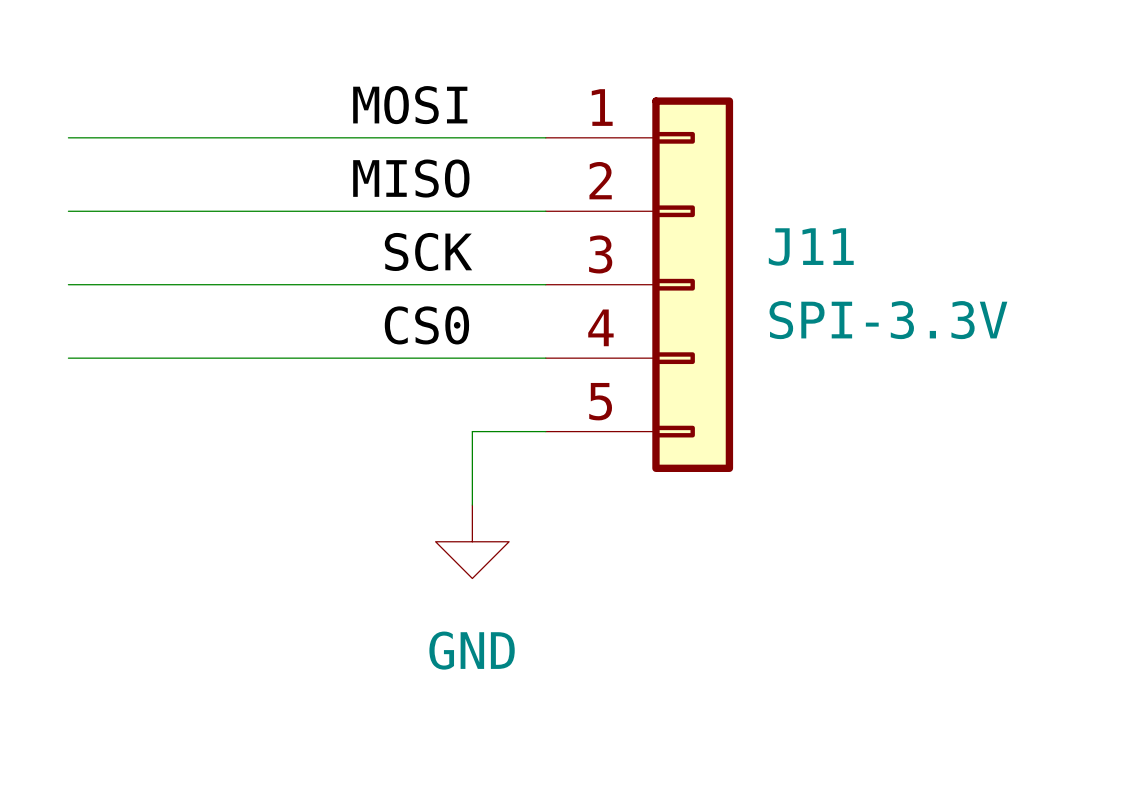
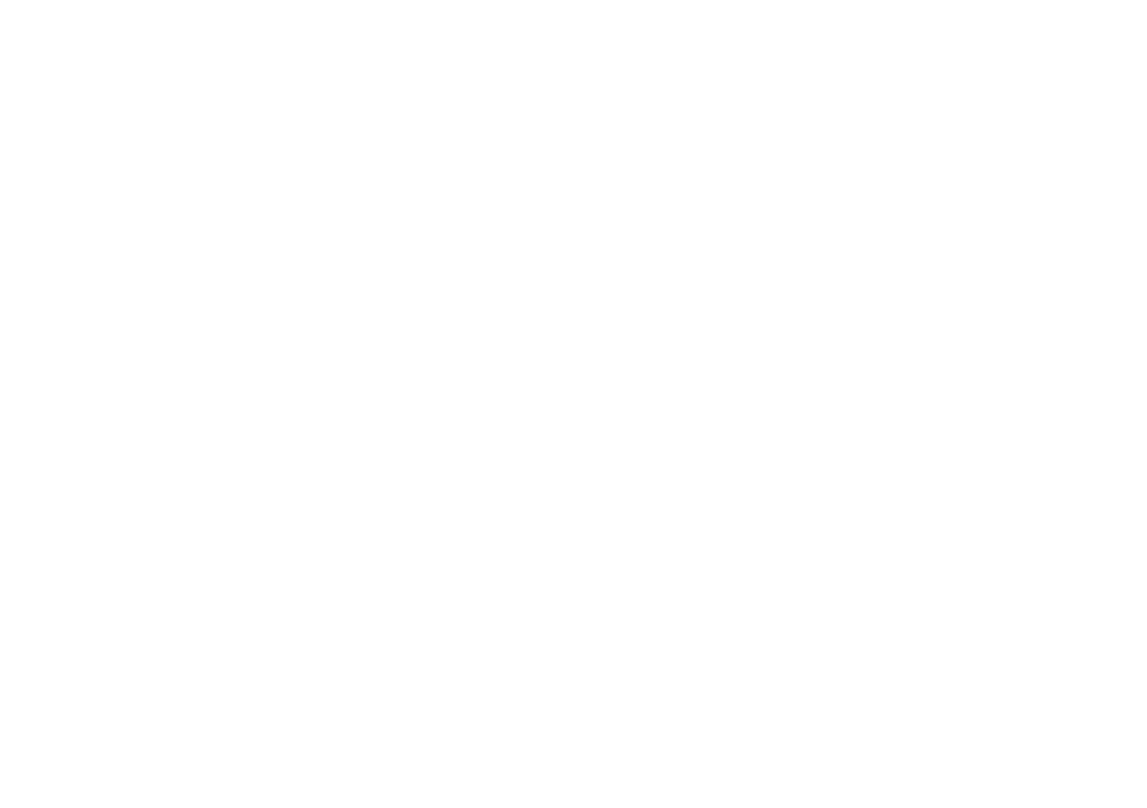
label: MOSI (410, 105) -> none
wire: (68, 137) (545, 137) -> none
label: MISO (411, 178) -> none
wire: (68, 211) (545, 211) -> none
label: SCK (428, 251) -> none
wire: (68, 284) (545, 284) -> none
J11: SPI-3.3V (639, 284) -> none
label: CS0 (426, 325) -> none
wire: (68, 358) (545, 358) -> none
wire: (545, 431) (472, 431) (472, 505) -> none
power symbol: GND (472, 541) -> none

